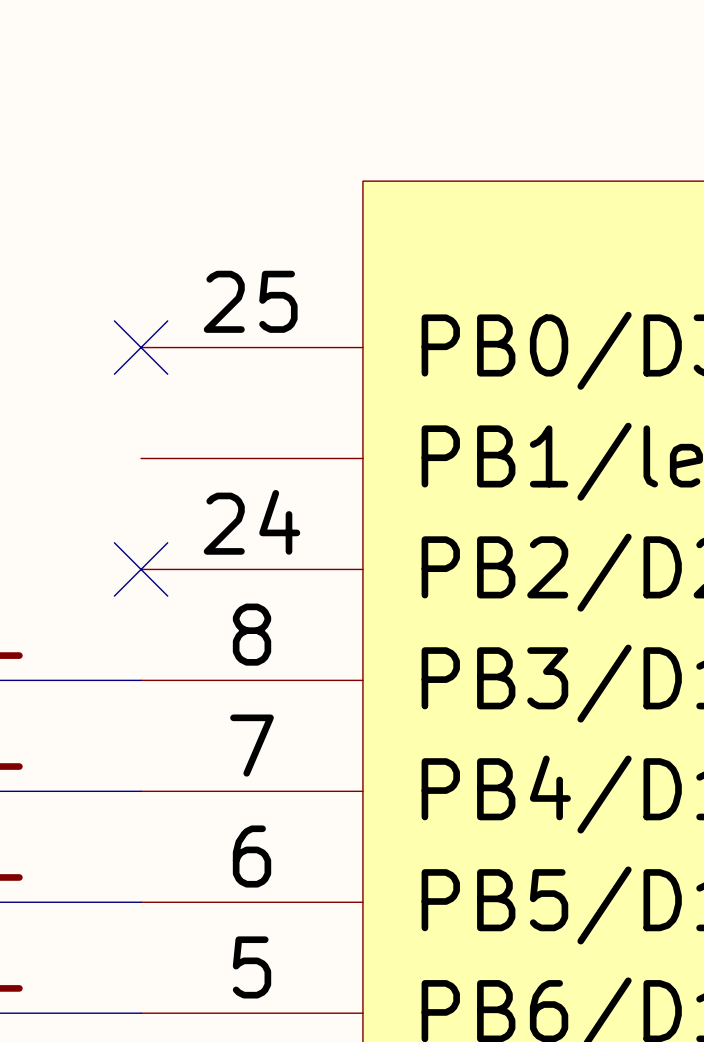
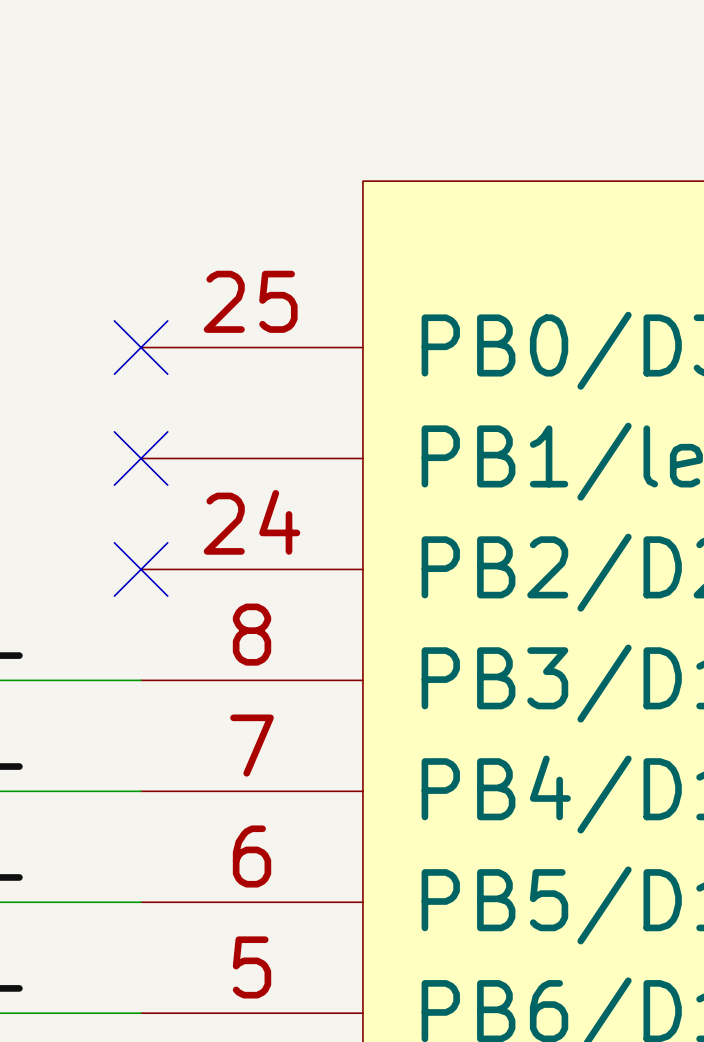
no-connect mark: none -> (141, 458)

